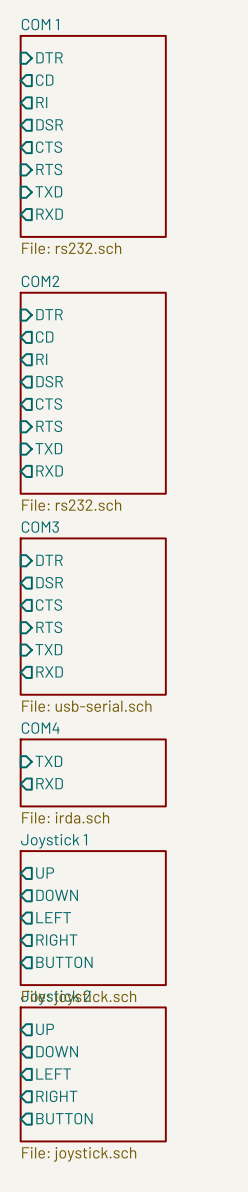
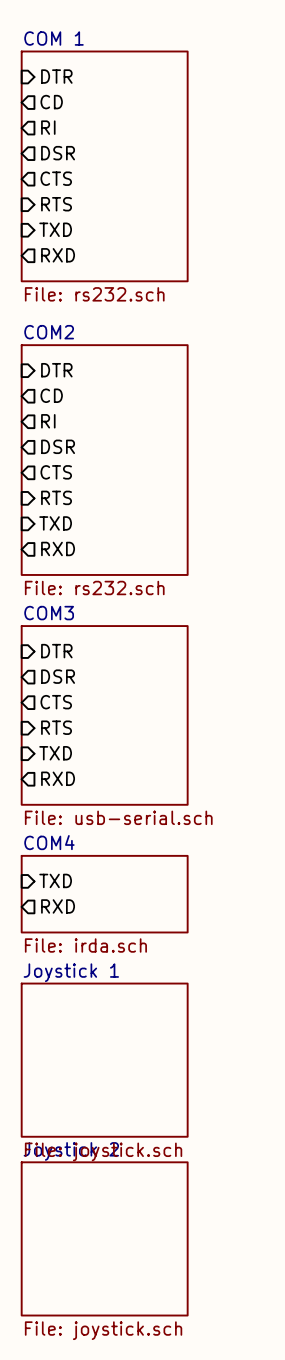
sheet pin: UP (45, 873) -> none
sheet pin: DOWN (57, 895) -> none
sheet pin: LEFT (53, 917) -> none
sheet pin: RIGHT (56, 940) -> none
sheet pin: BUTTON (64, 962) -> none
sheet pin: UP (45, 1029) -> none
sheet pin: DOWN (57, 1051) -> none
sheet pin: LEFT (53, 1074) -> none
sheet pin: RIGHT (56, 1096) -> none
sheet pin: BUTTON (64, 1118) -> none

